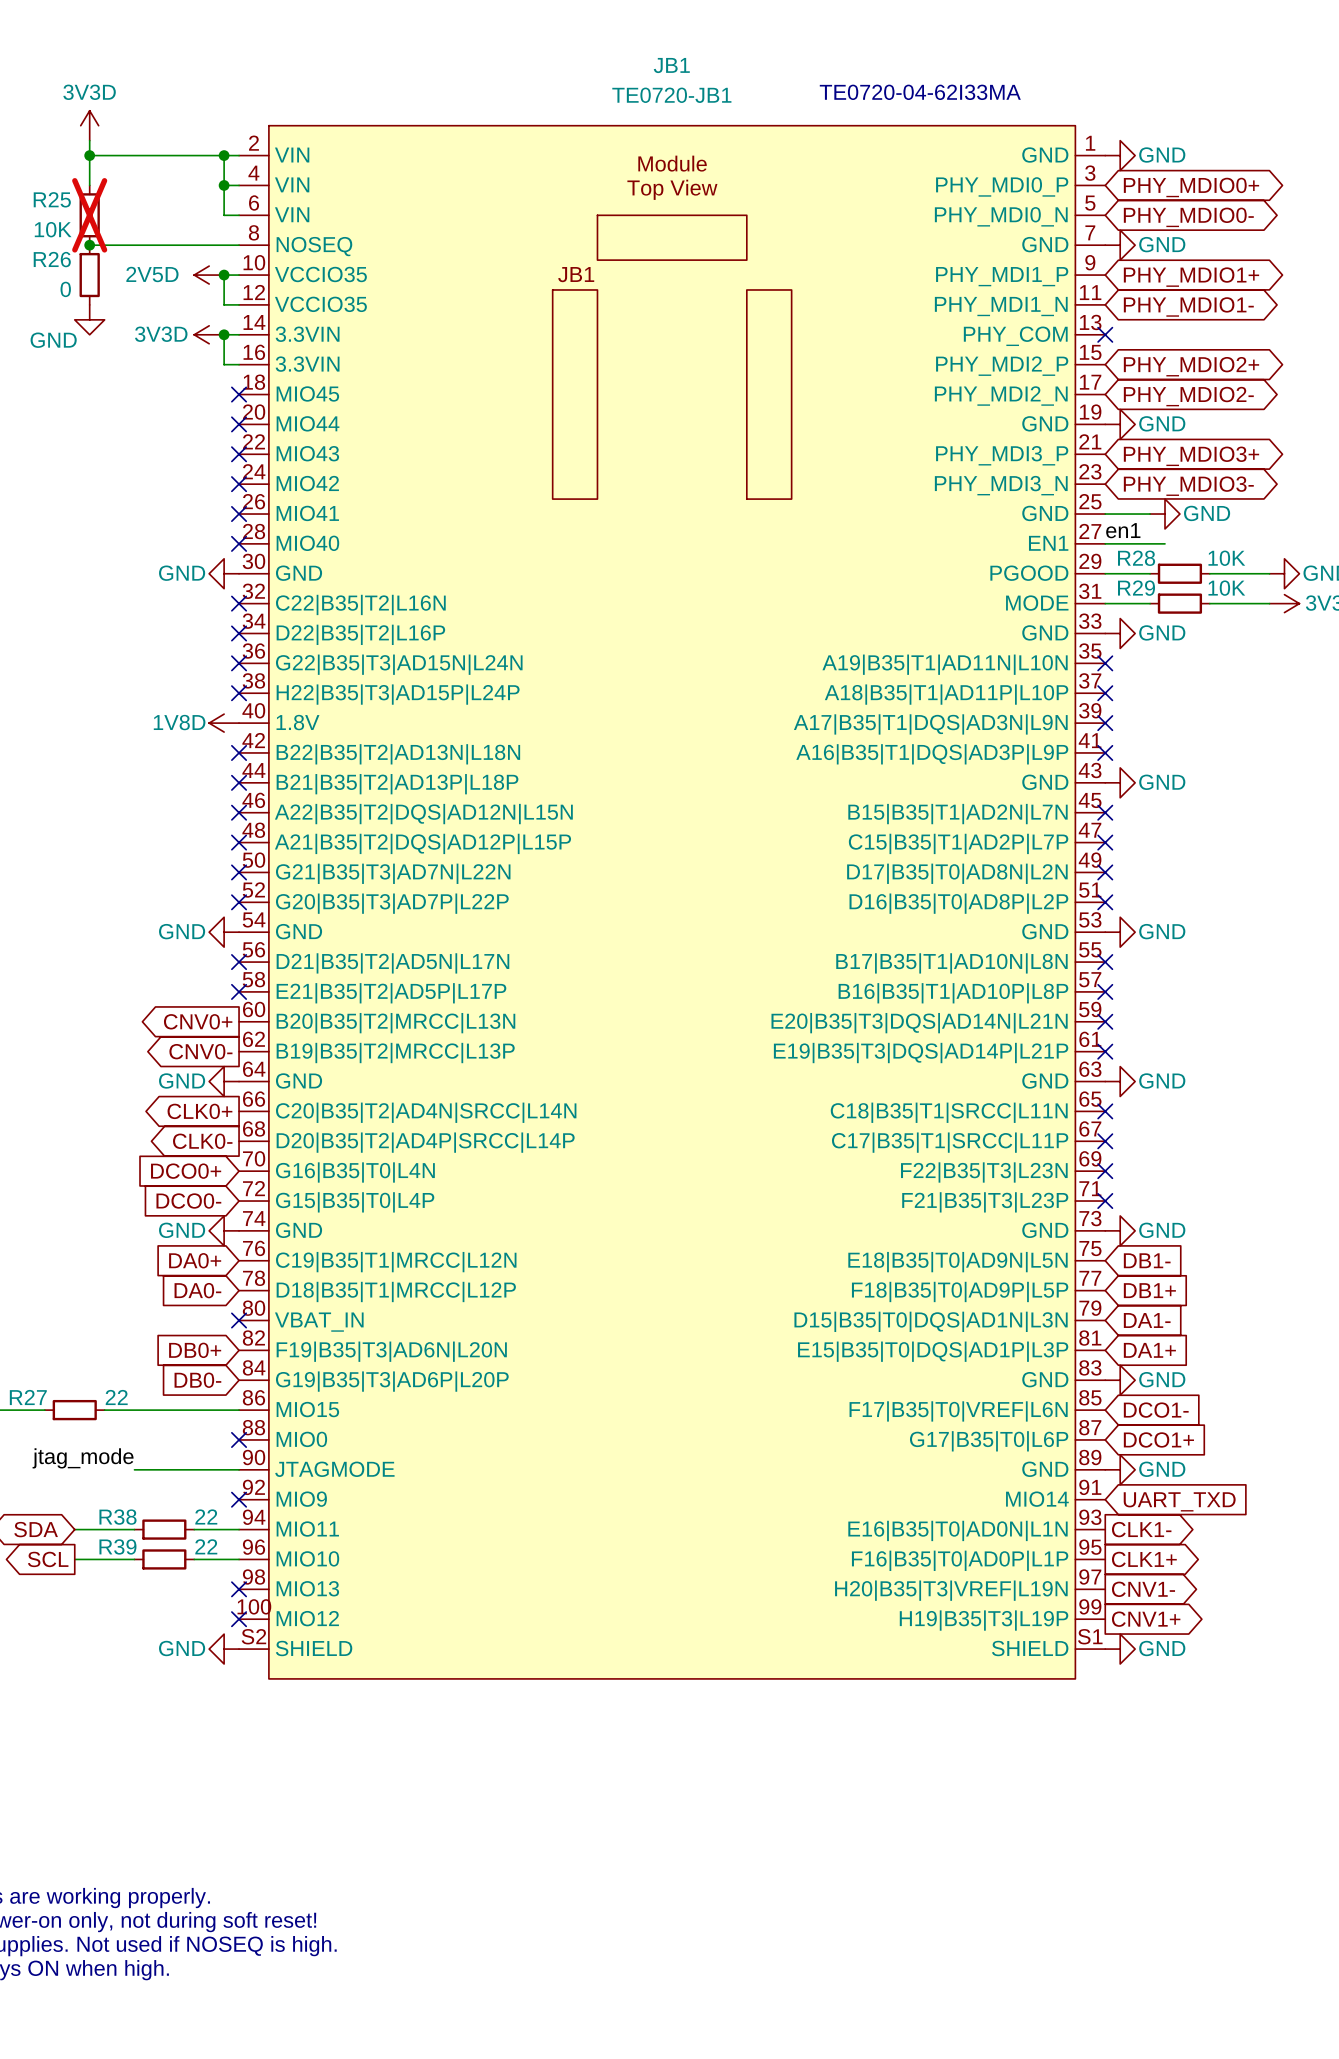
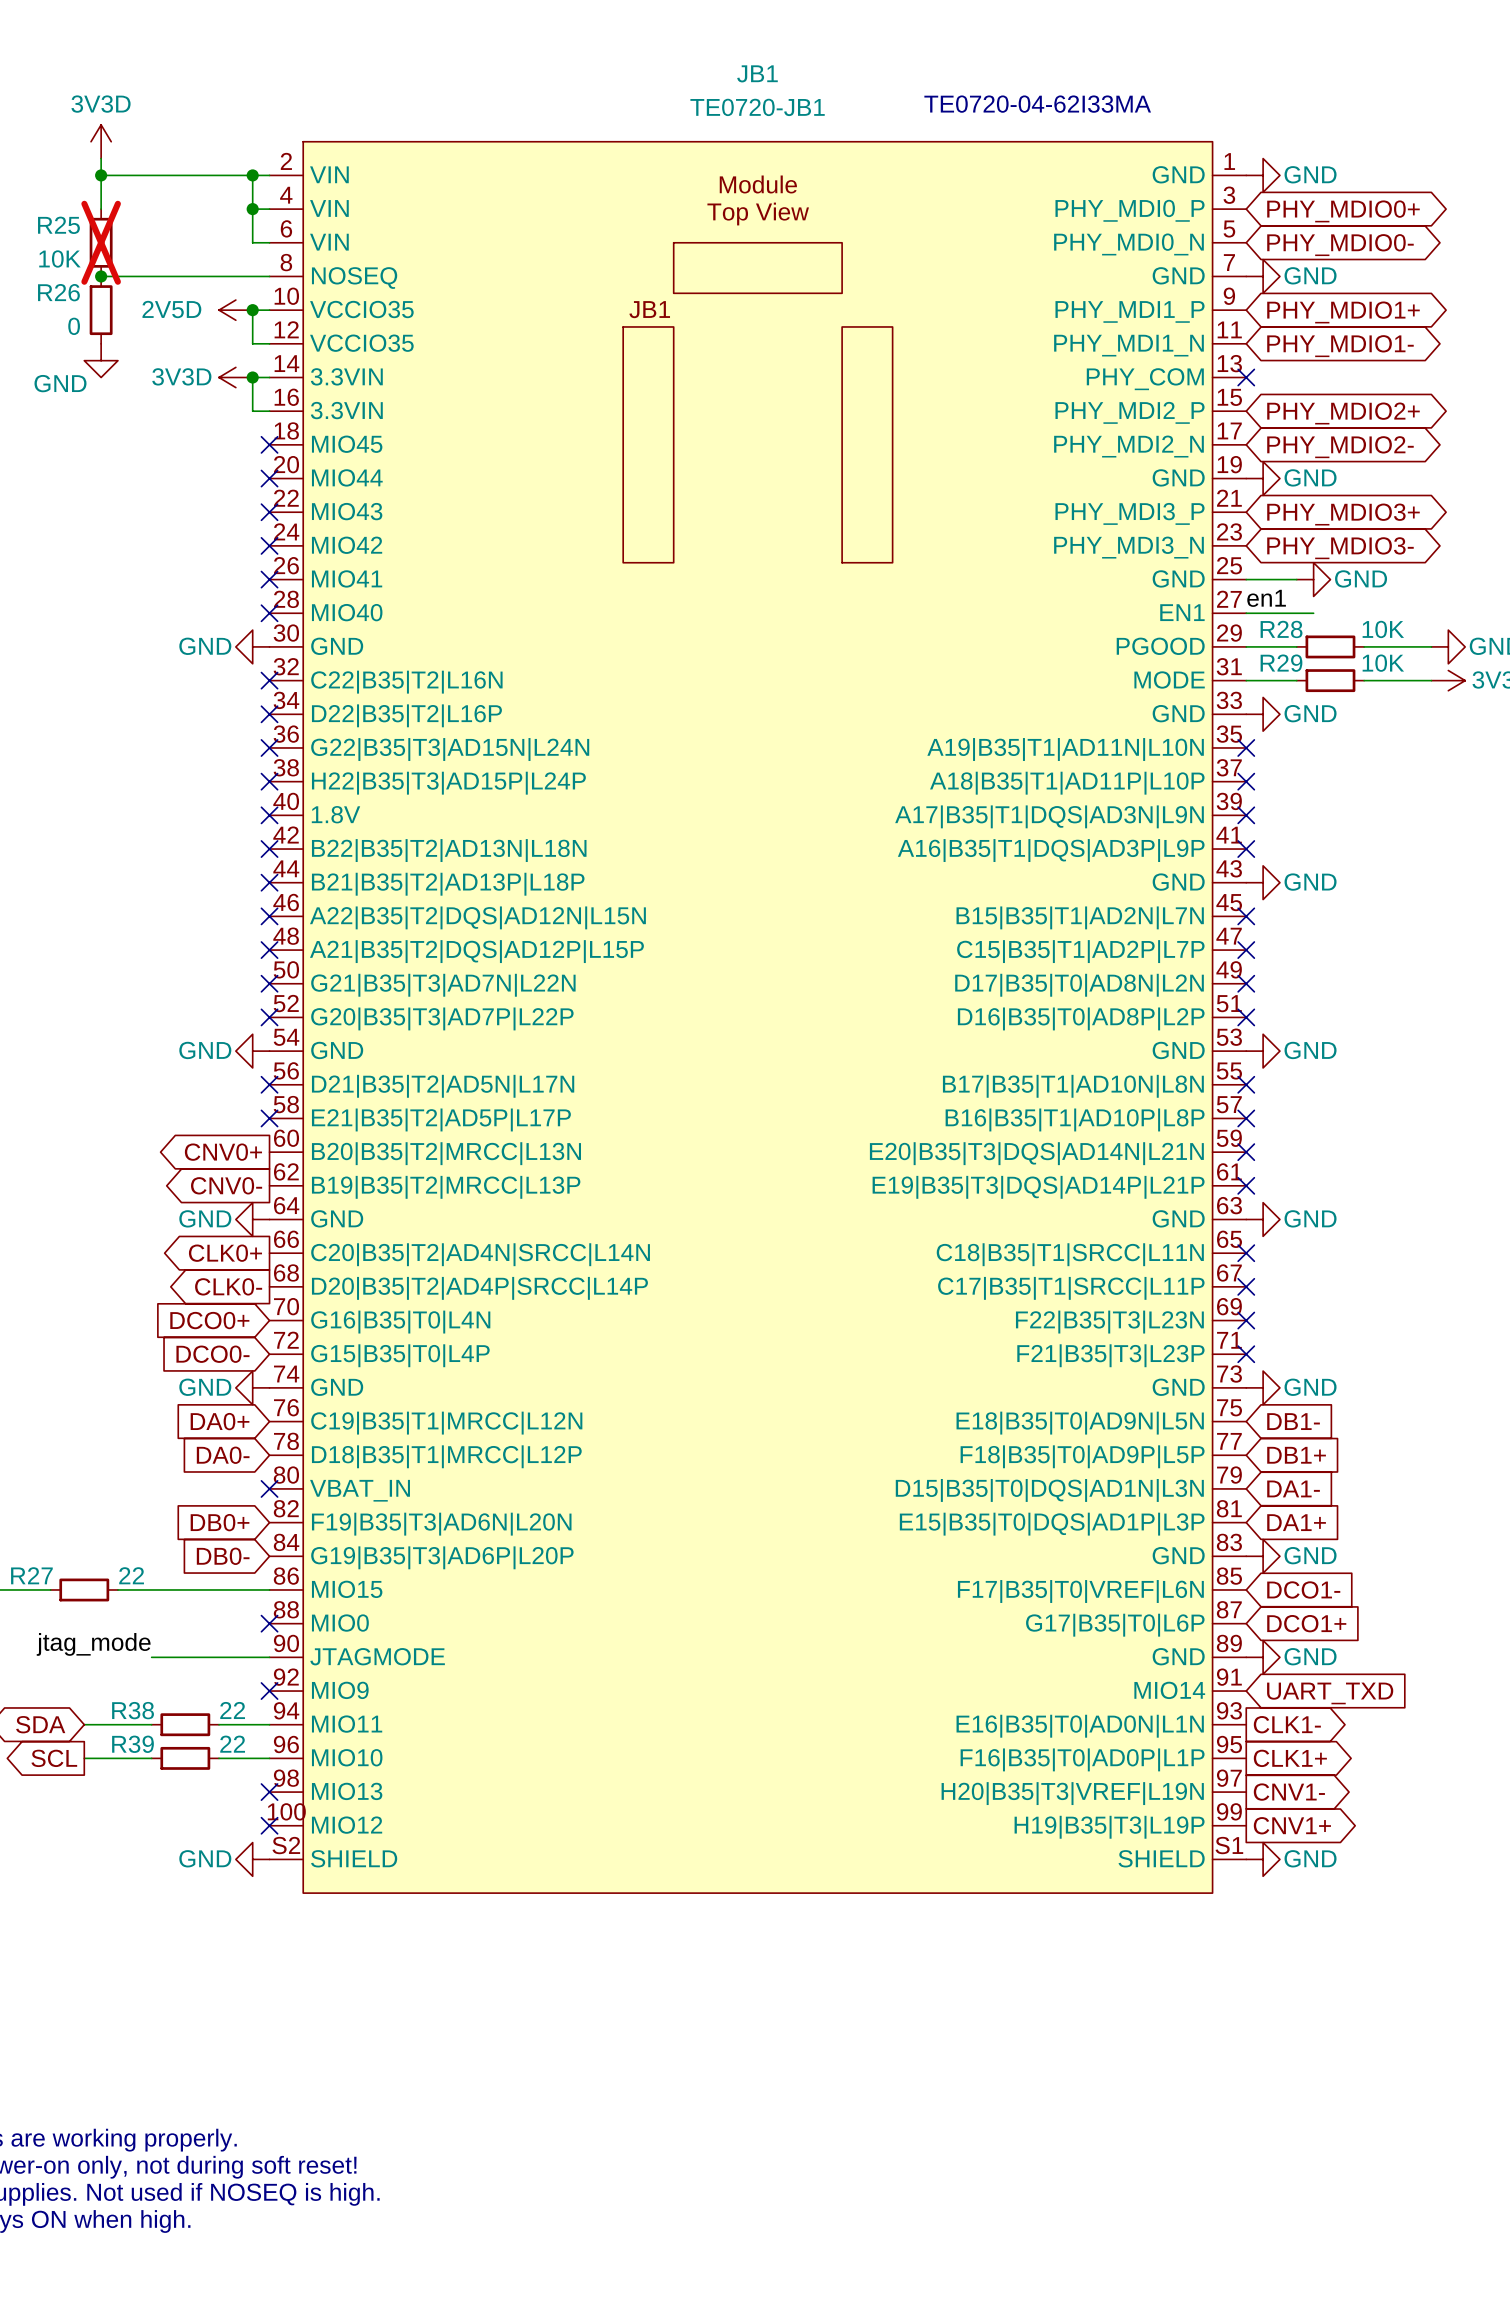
power symbol: 1V8D (224, 723) -> none
no-connect mark: none -> (269, 815)

